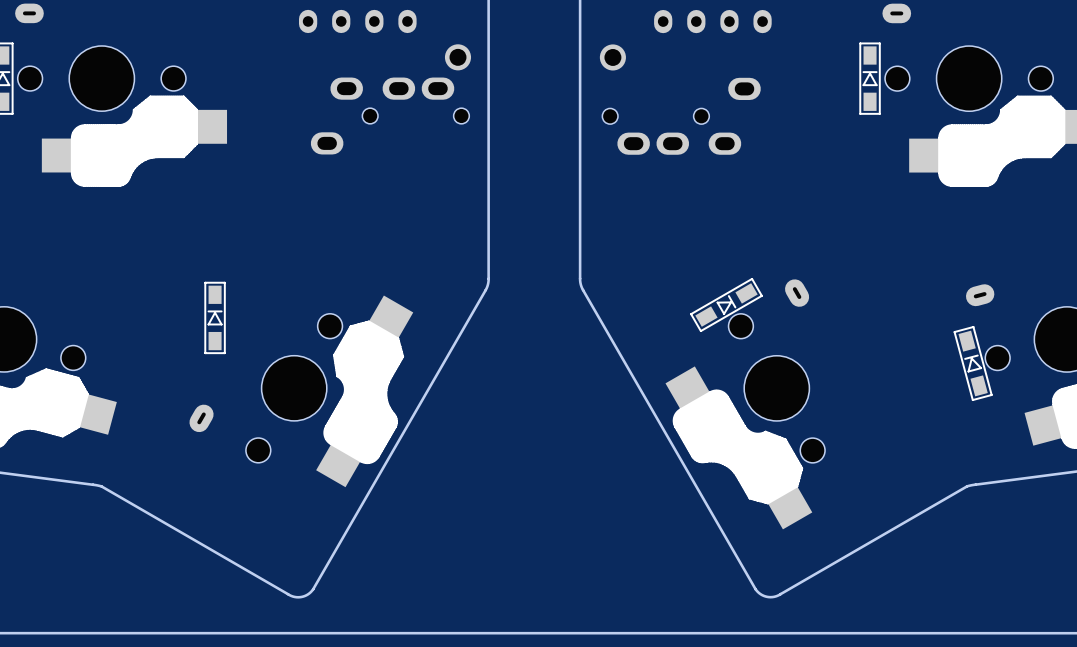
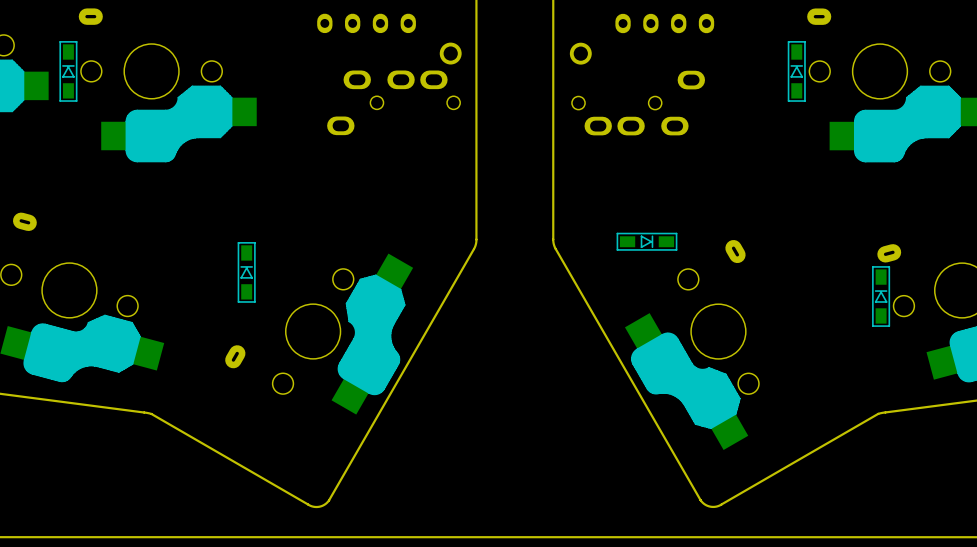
part: none -> (646, 241)
part: (726, 305) -> none
part: none -> (881, 296)
part: (973, 363) -> none

